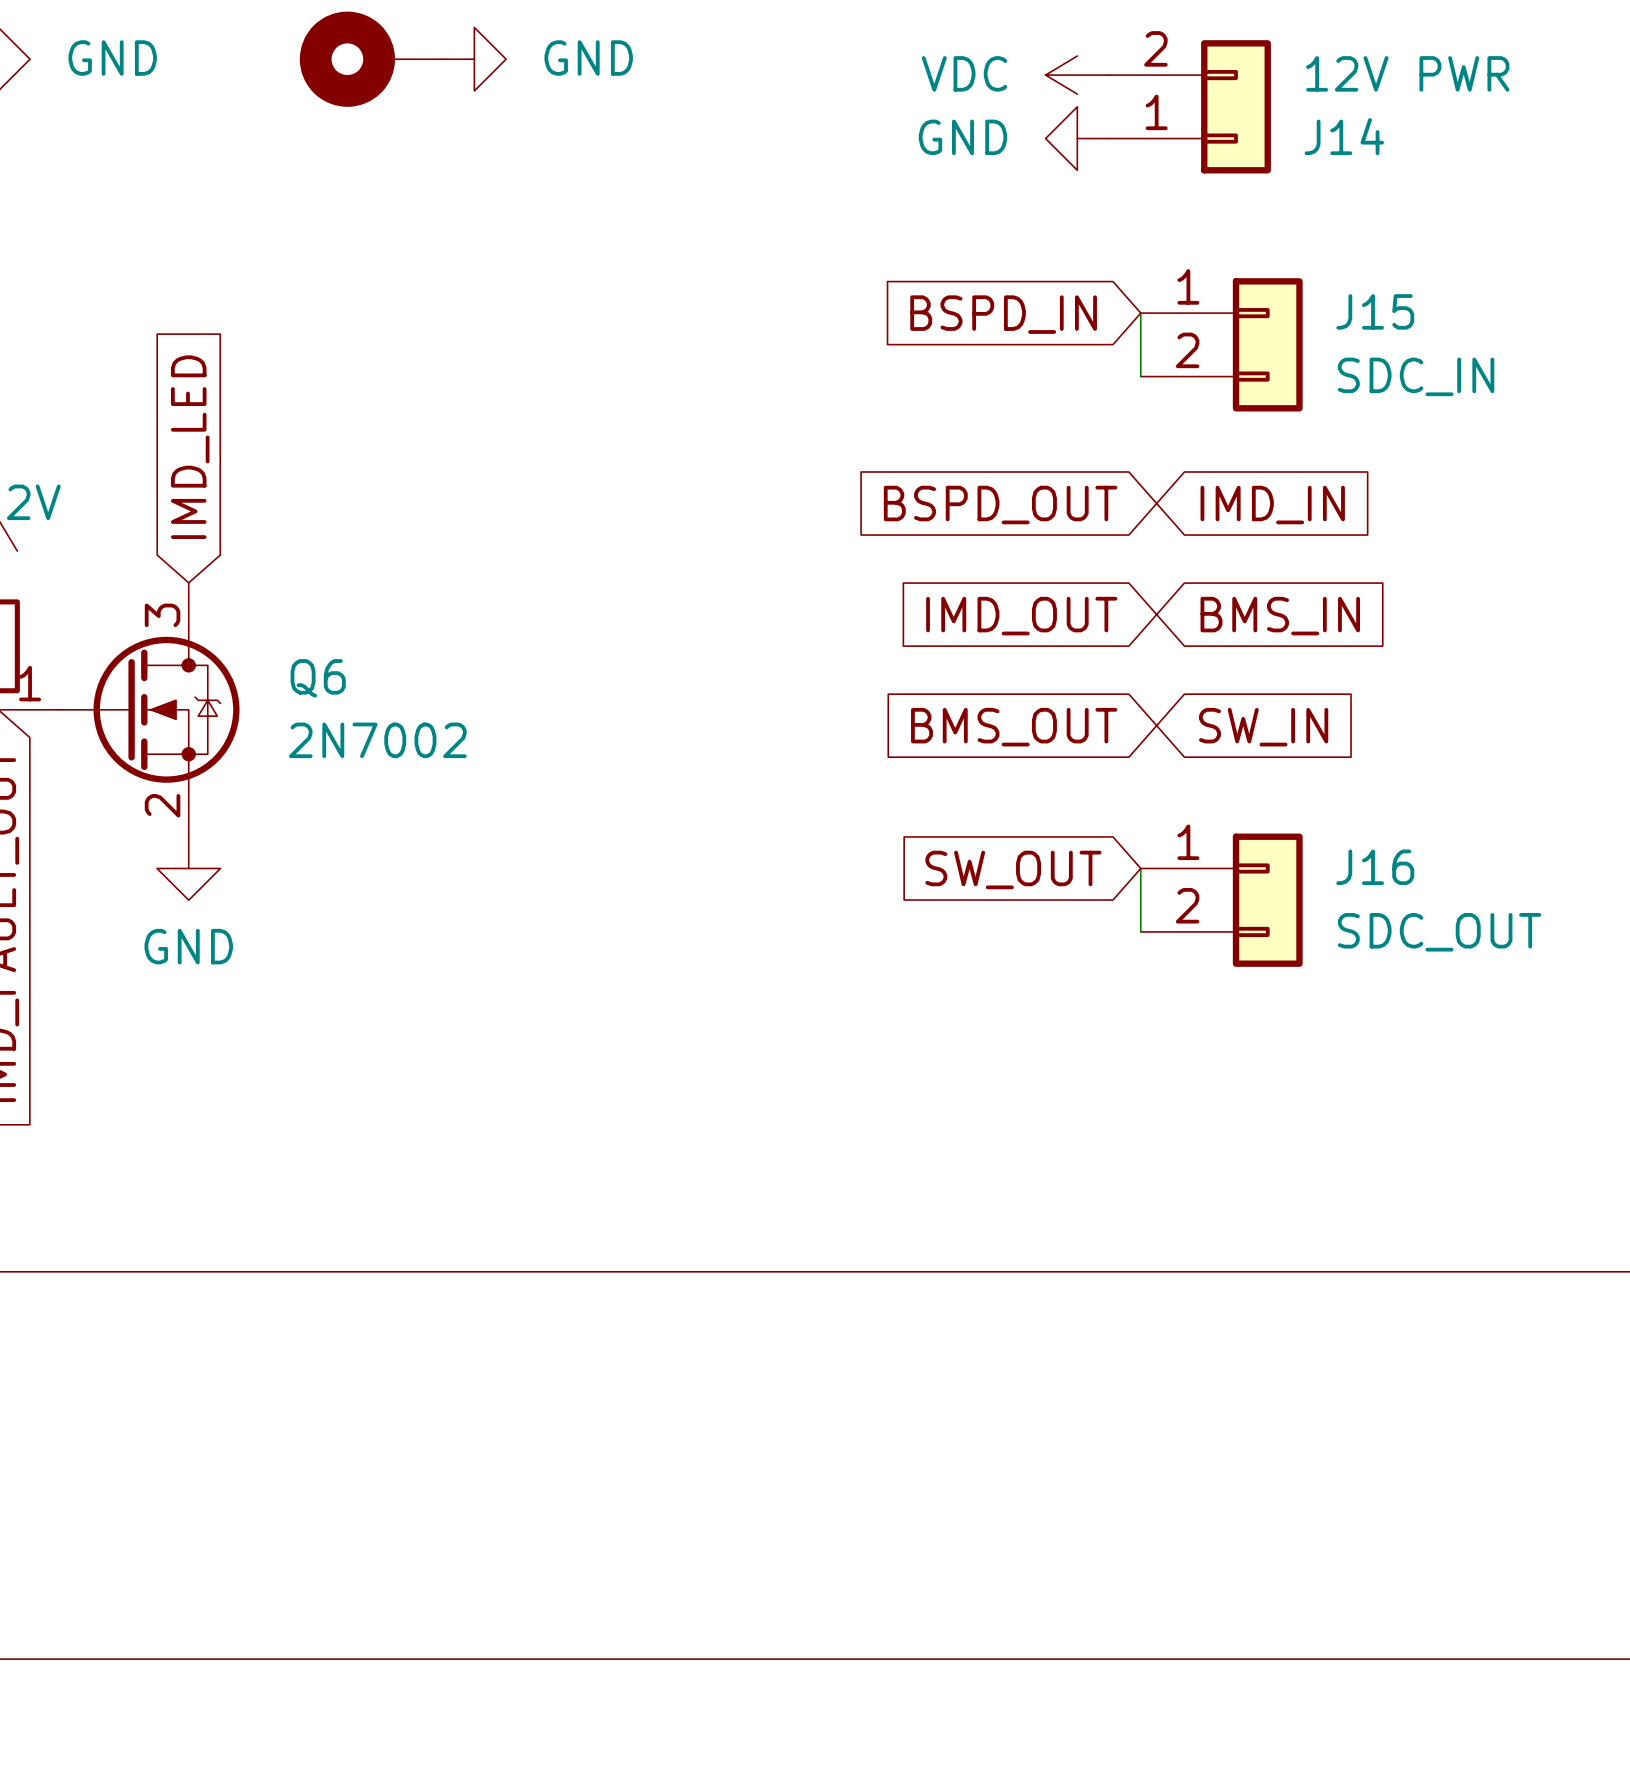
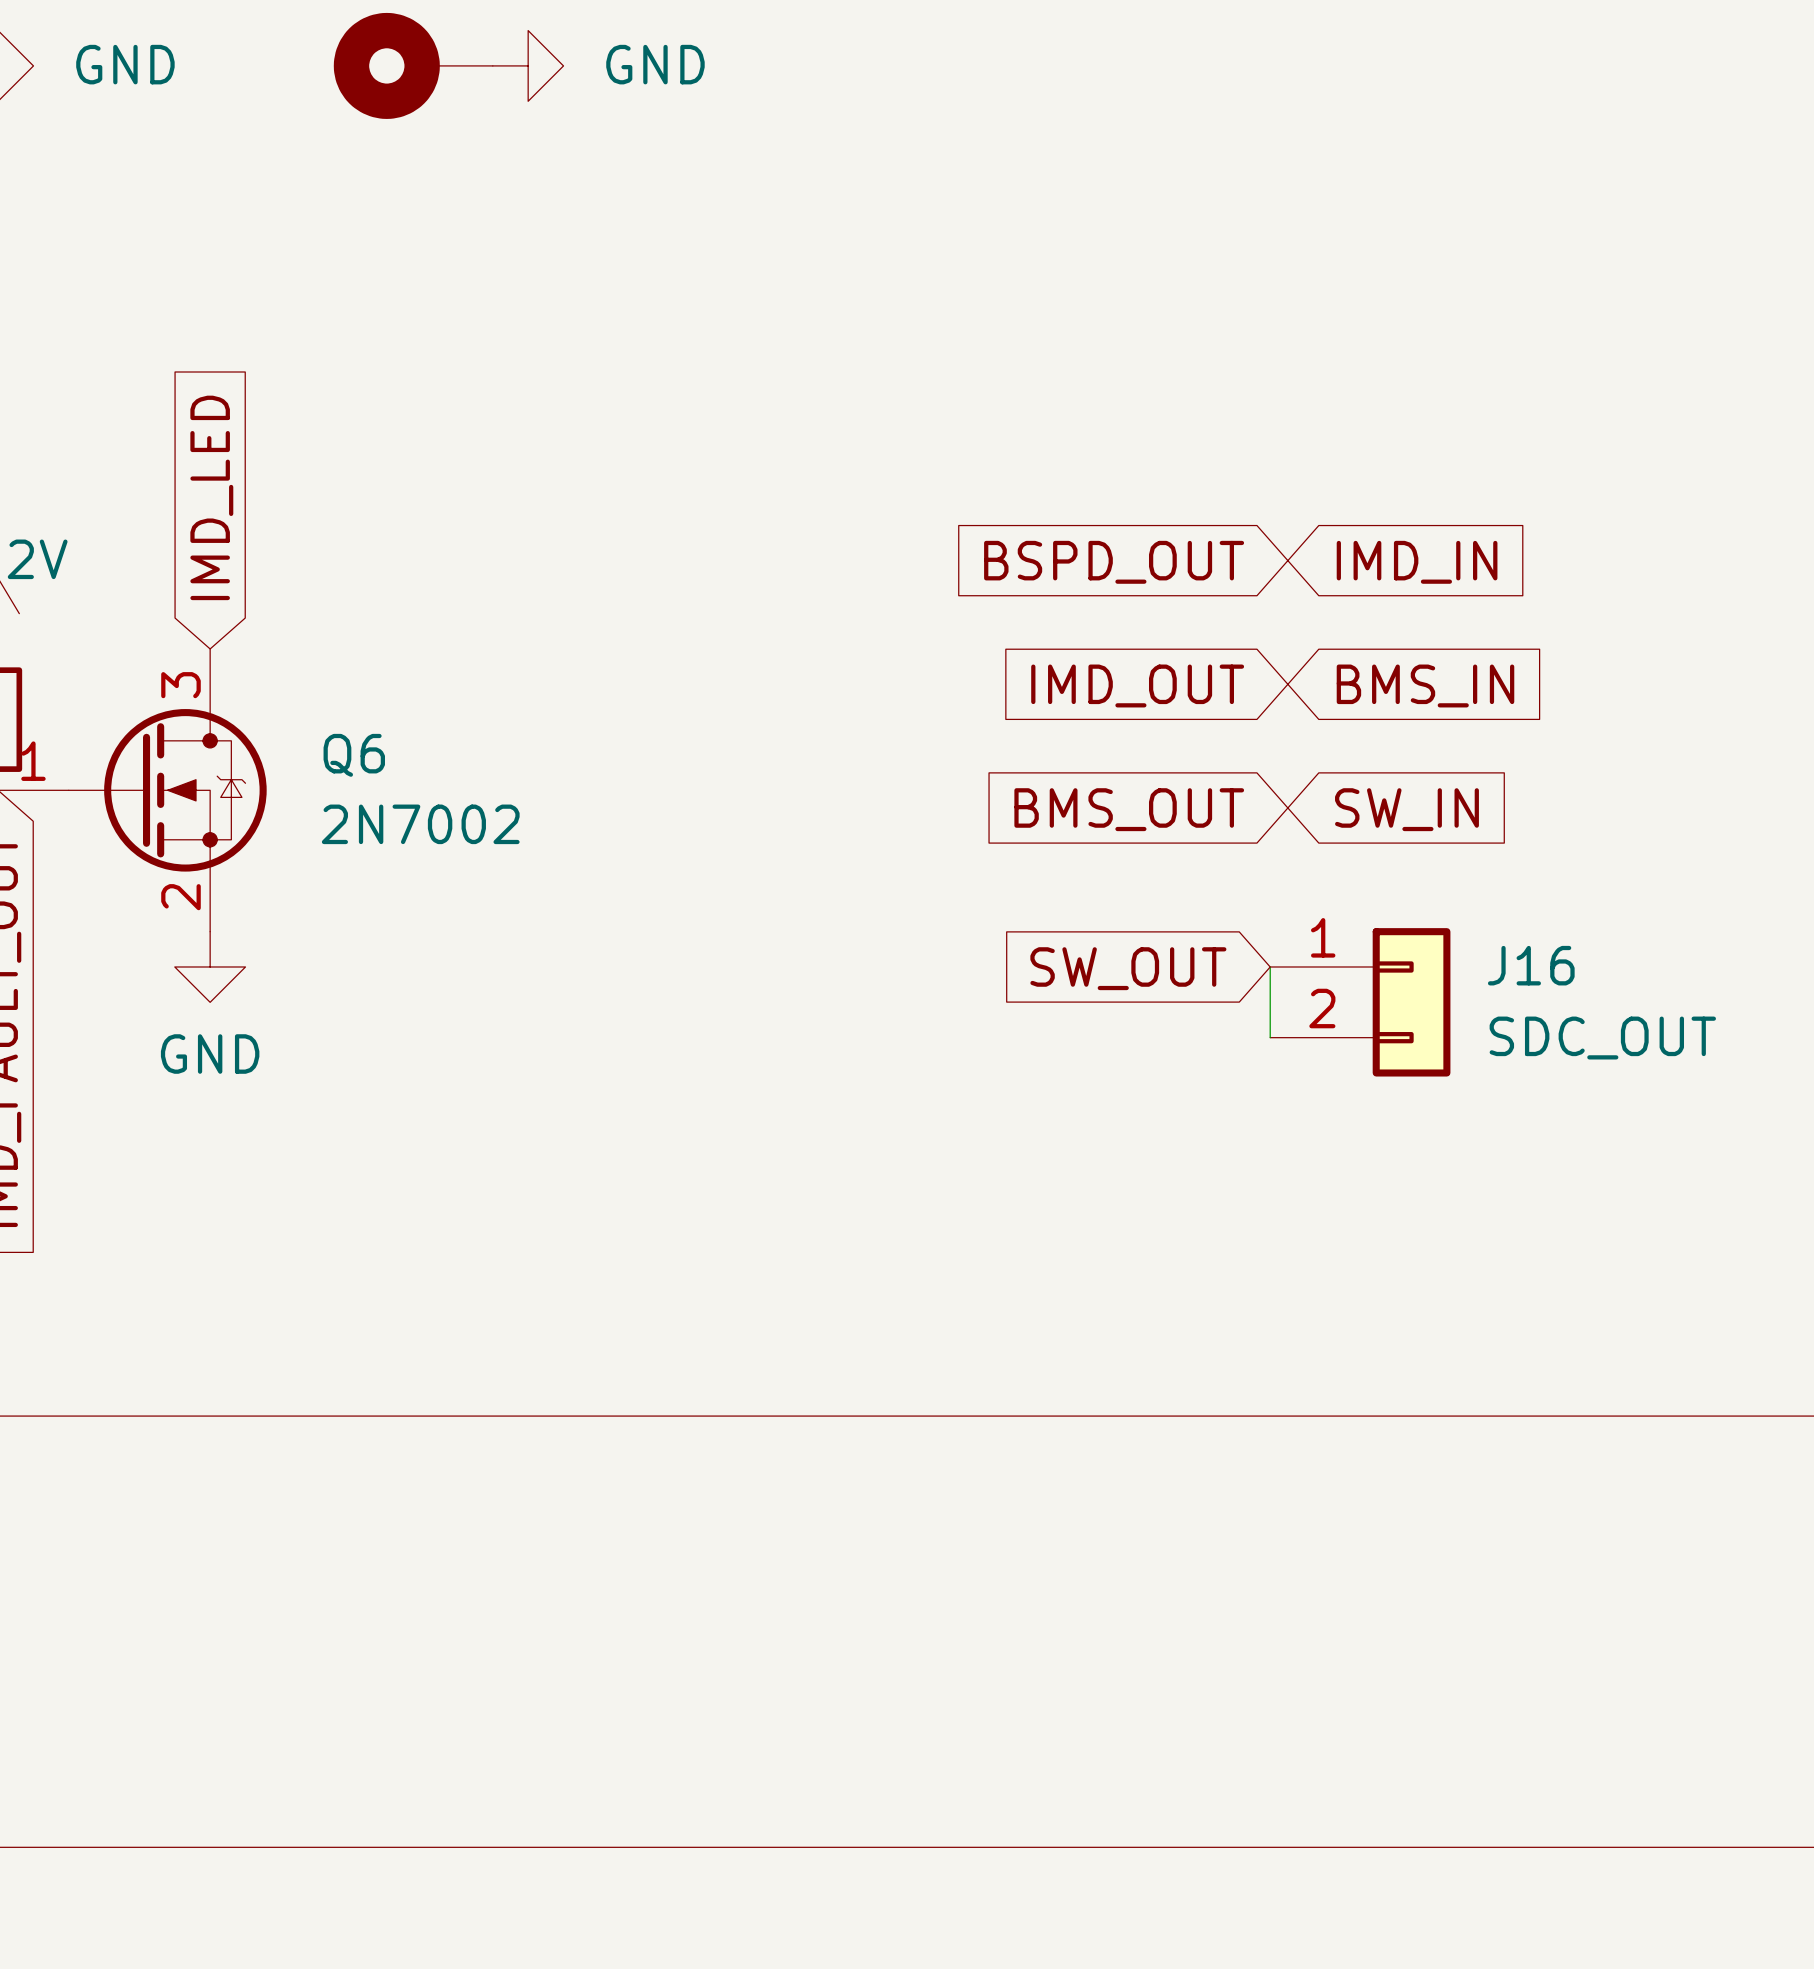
power symbol: VDC (1077, 75) -> none
J14: 12V PWR (1189, 106) -> none
power symbol: GND (1077, 138) -> none
wire: (1140, 313) (1140, 376) -> none
global label: BSPD_IN (1003, 314) -> none
J15: SDC_IN (1221, 344) -> none

